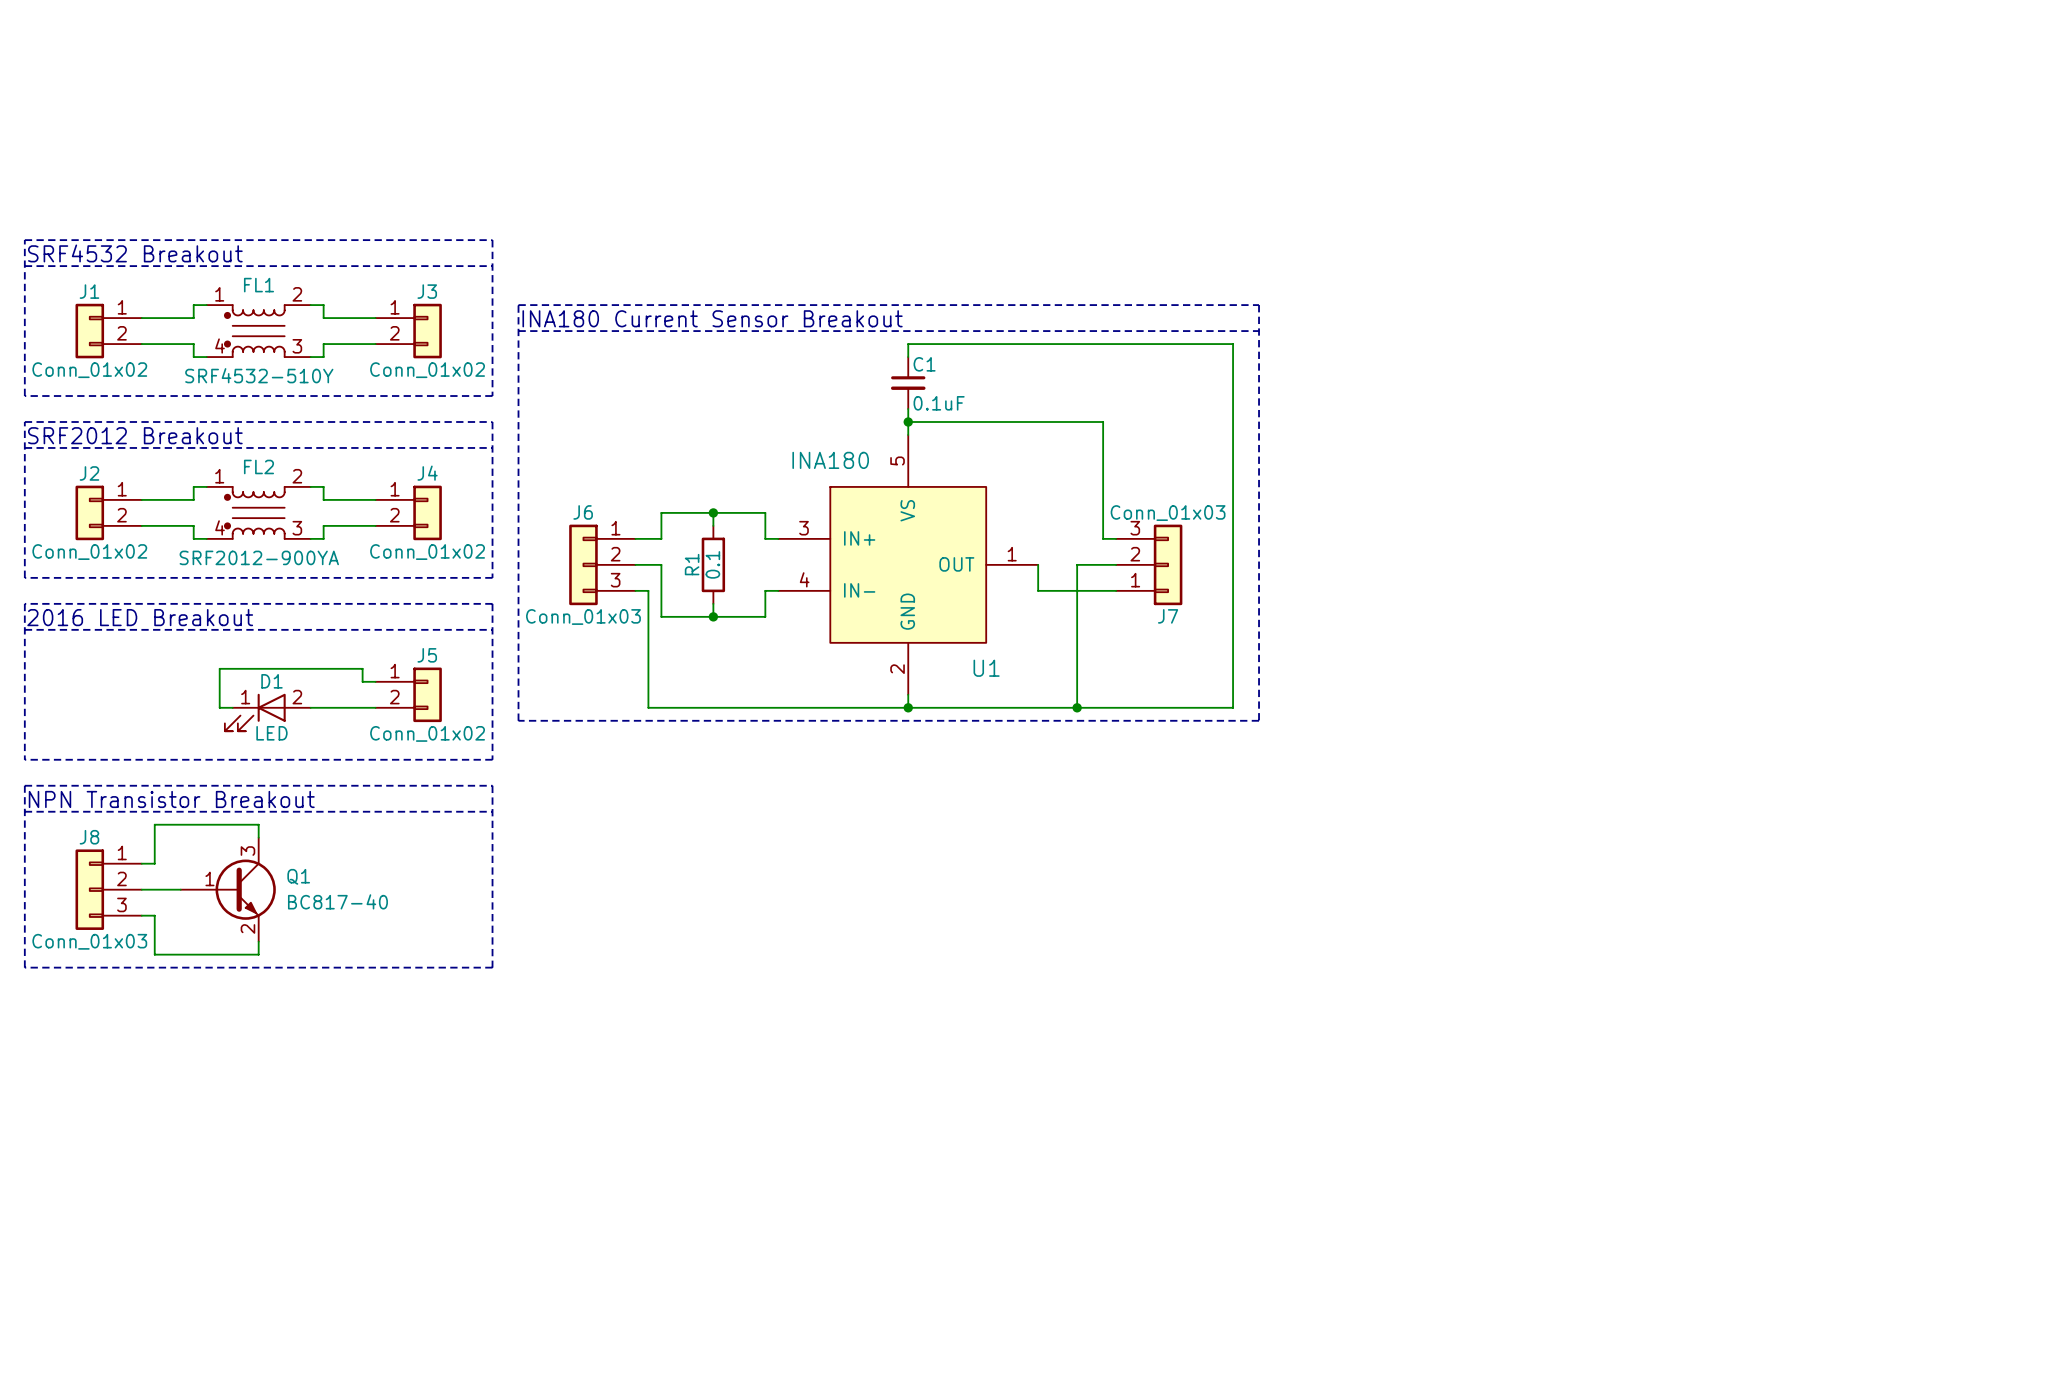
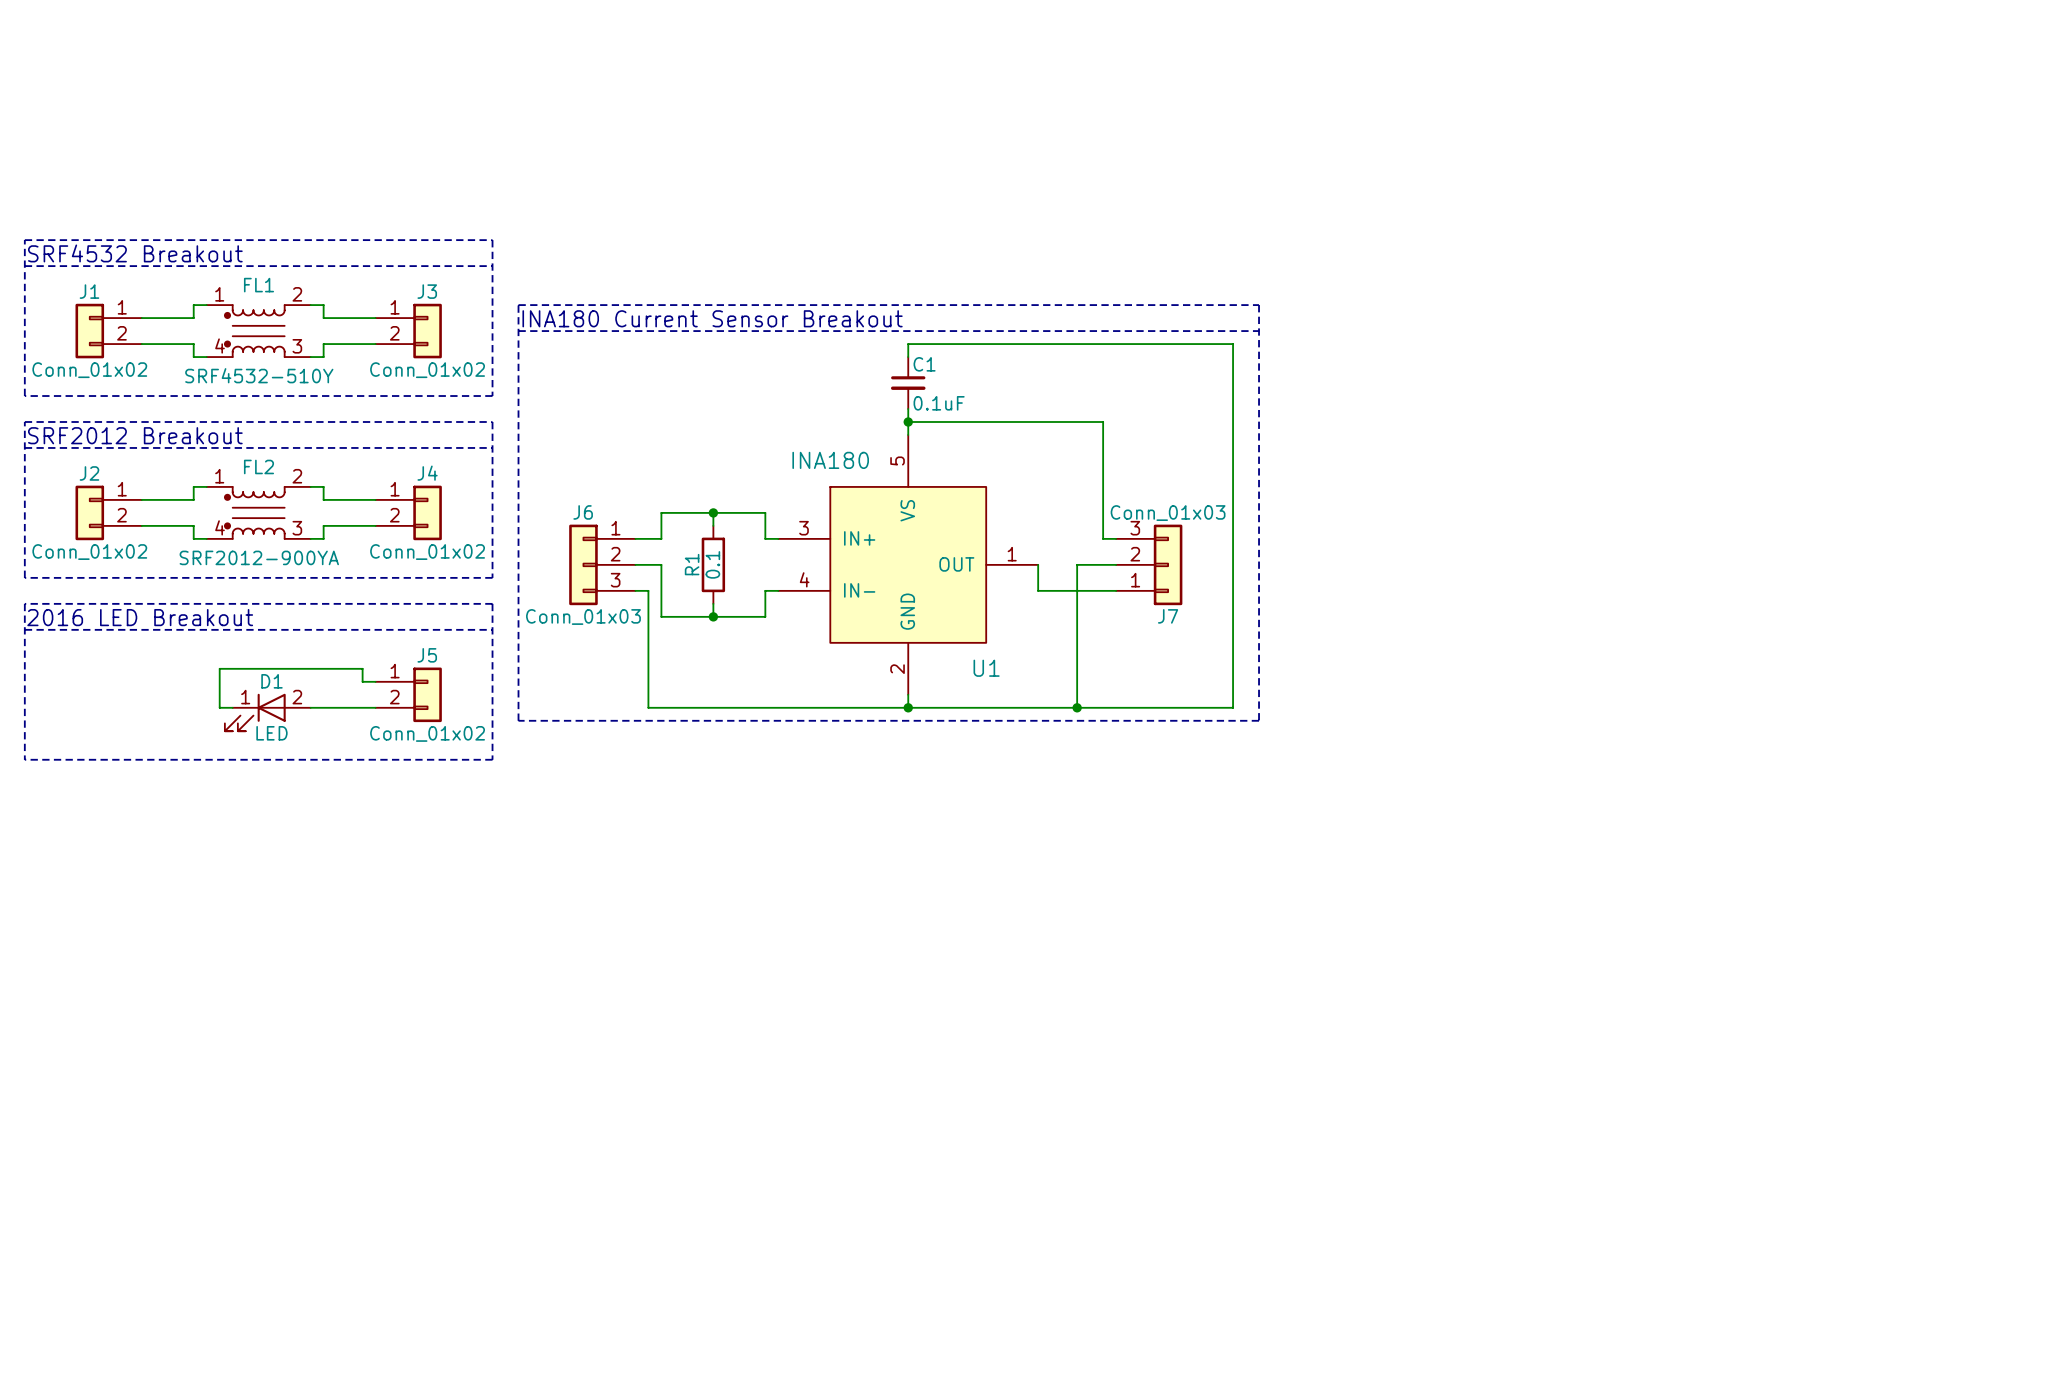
line: (24, 785) (24, 967) (492, 967) (492, 785) (24, 785) -> none
text: NPN Transistor Breakout (171, 799) -> none
line: (24, 811) (492, 811) -> none
wire: (258, 837) (258, 824) (154, 824) (154, 863) (141, 863) -> none
J8: Conn_01x03 (108, 889) -> none
wire: (141, 889) (180, 889) -> none
Q1: BC817-40 (228, 889) -> none
wire: (141, 915) (154, 915) (154, 954) (258, 954) (258, 941) -> none

